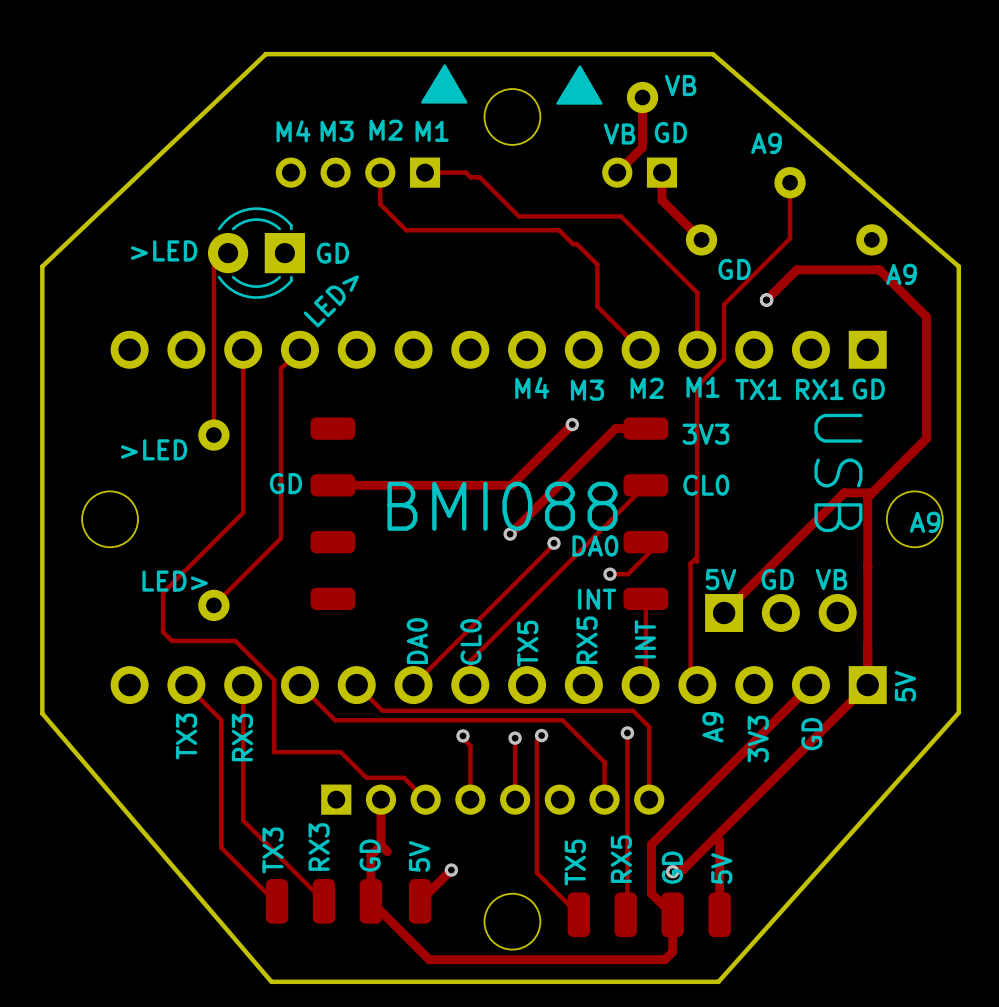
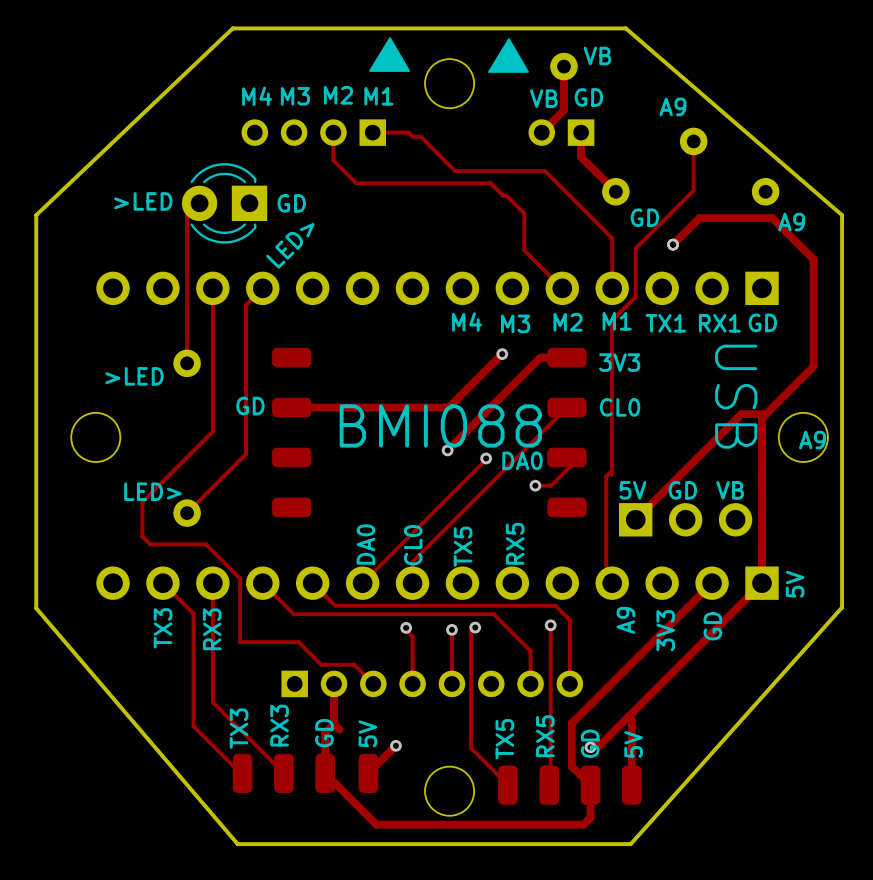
track: (645, 598) (645, 679) (640, 685) -> none
text: INT (597, 599) -> none
text: INT (645, 639) -> none

